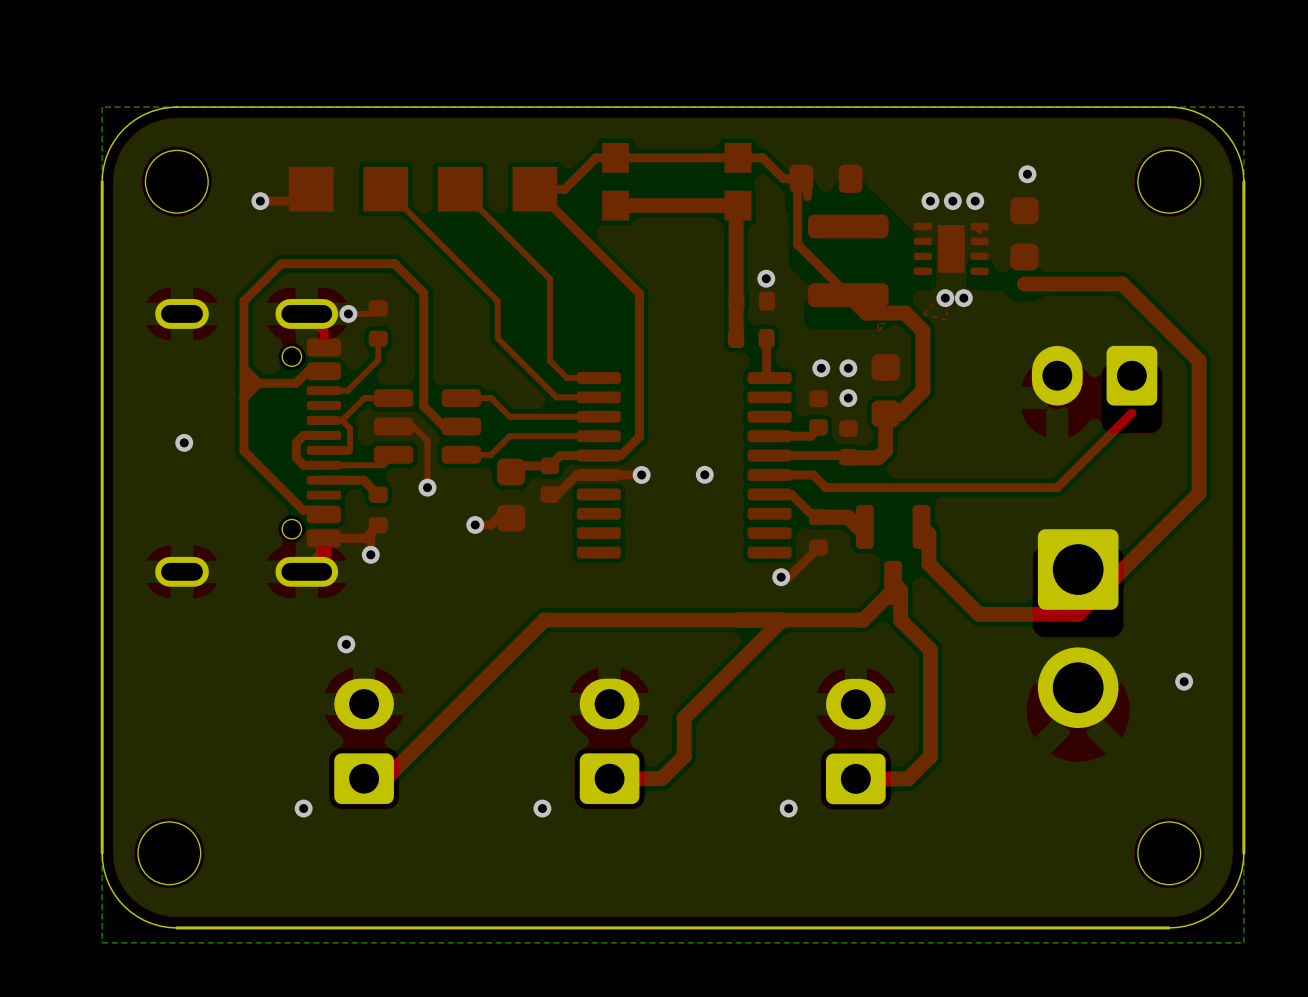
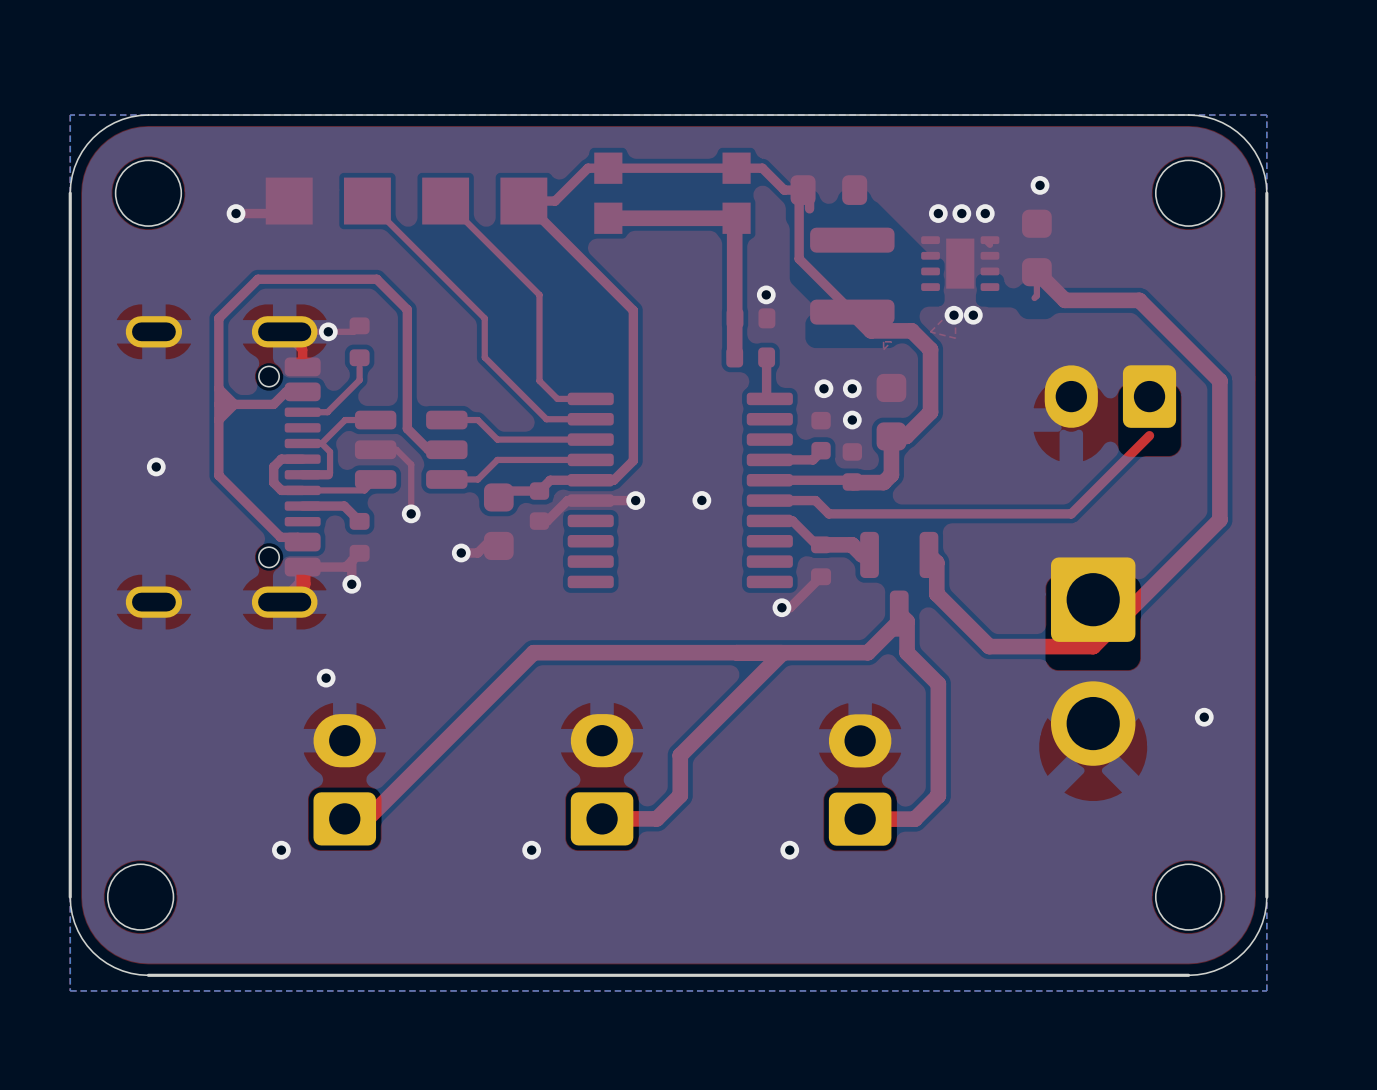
top track: (1022, 281) (1024, 283) (1051, 283) -> (1034, 298) (1036, 295) (1036, 272) (1065, 300)

